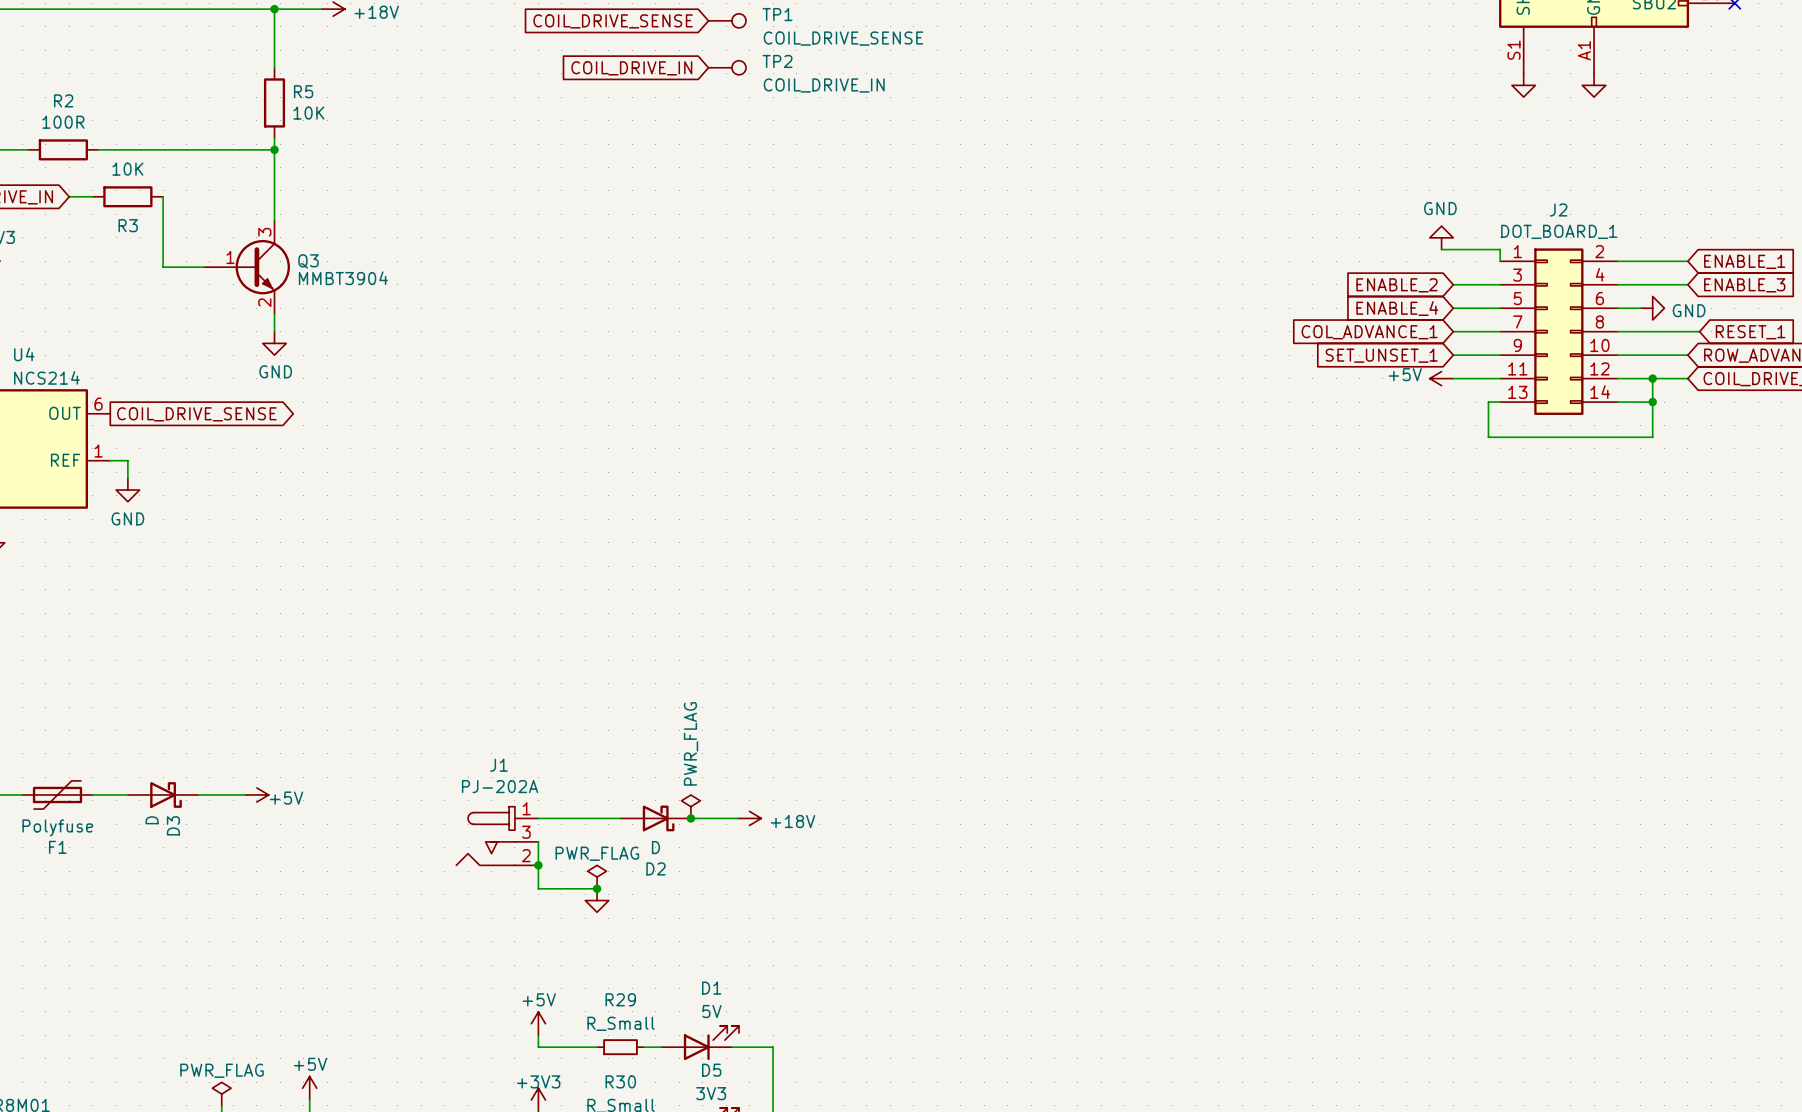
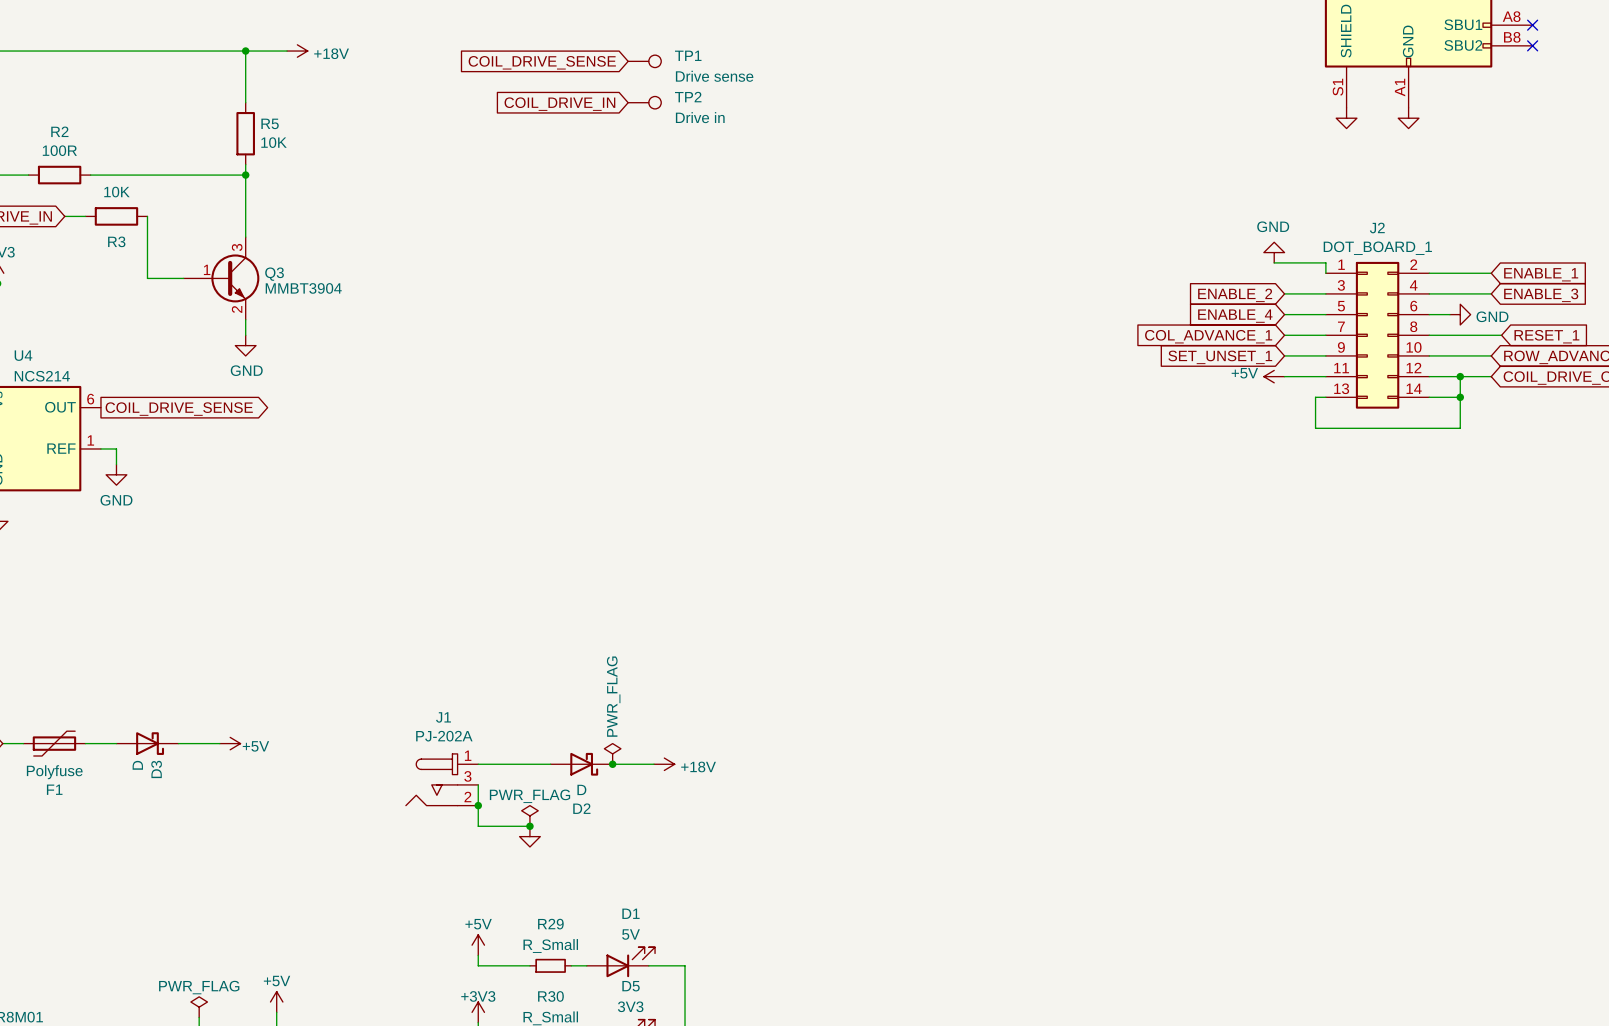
TP1 value: COIL_DRIVE_SENSE (843, 38) -> Drive sense (714, 76)
TP2 value: COIL_DRIVE_IN (824, 85) -> Drive in (700, 117)

